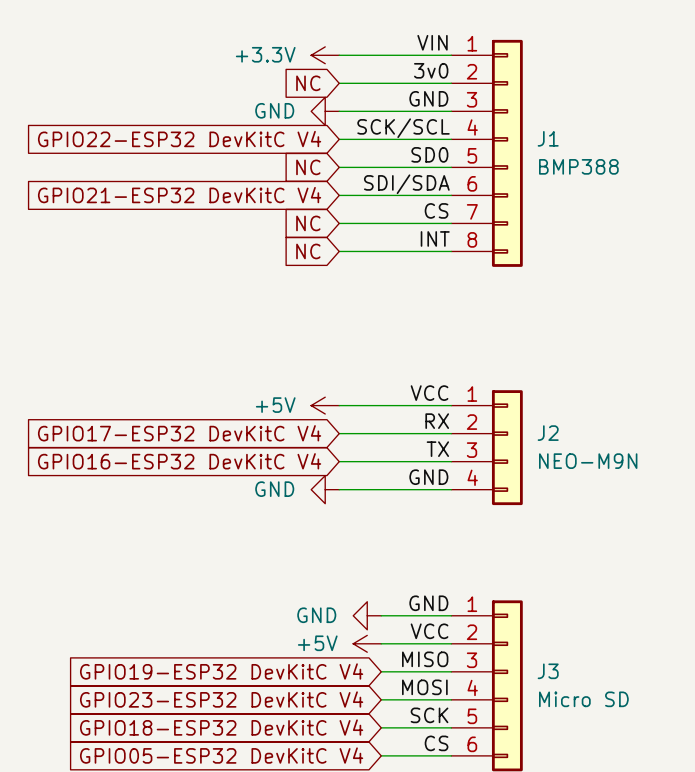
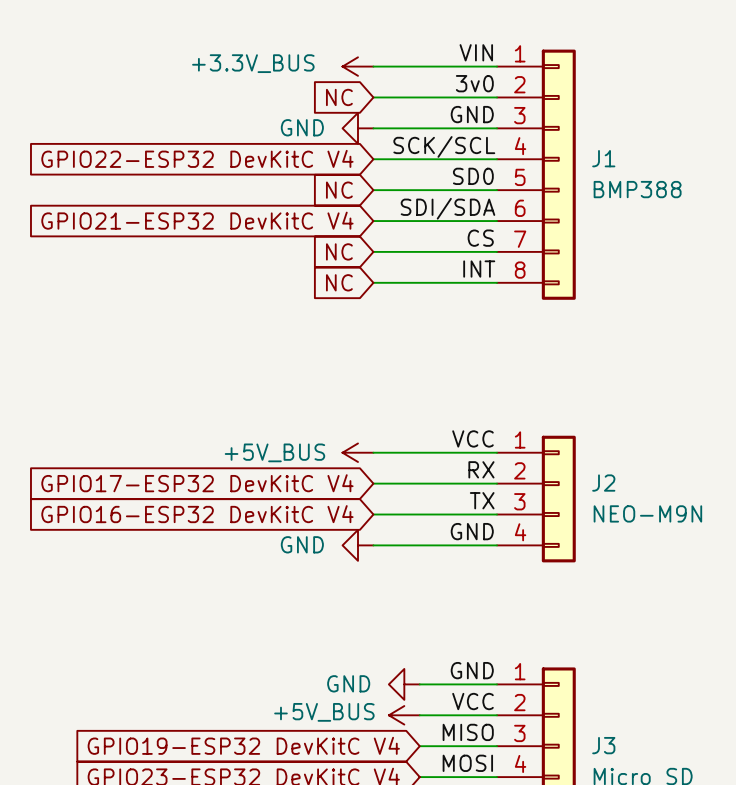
power symbol: +3.3V (325, 55) -> +3.3V_BUS (358, 66)
power symbol: +5V (325, 405) -> +5V_BUS (358, 452)
power symbol: +5V (367, 643) -> +5V_BUS (404, 715)

